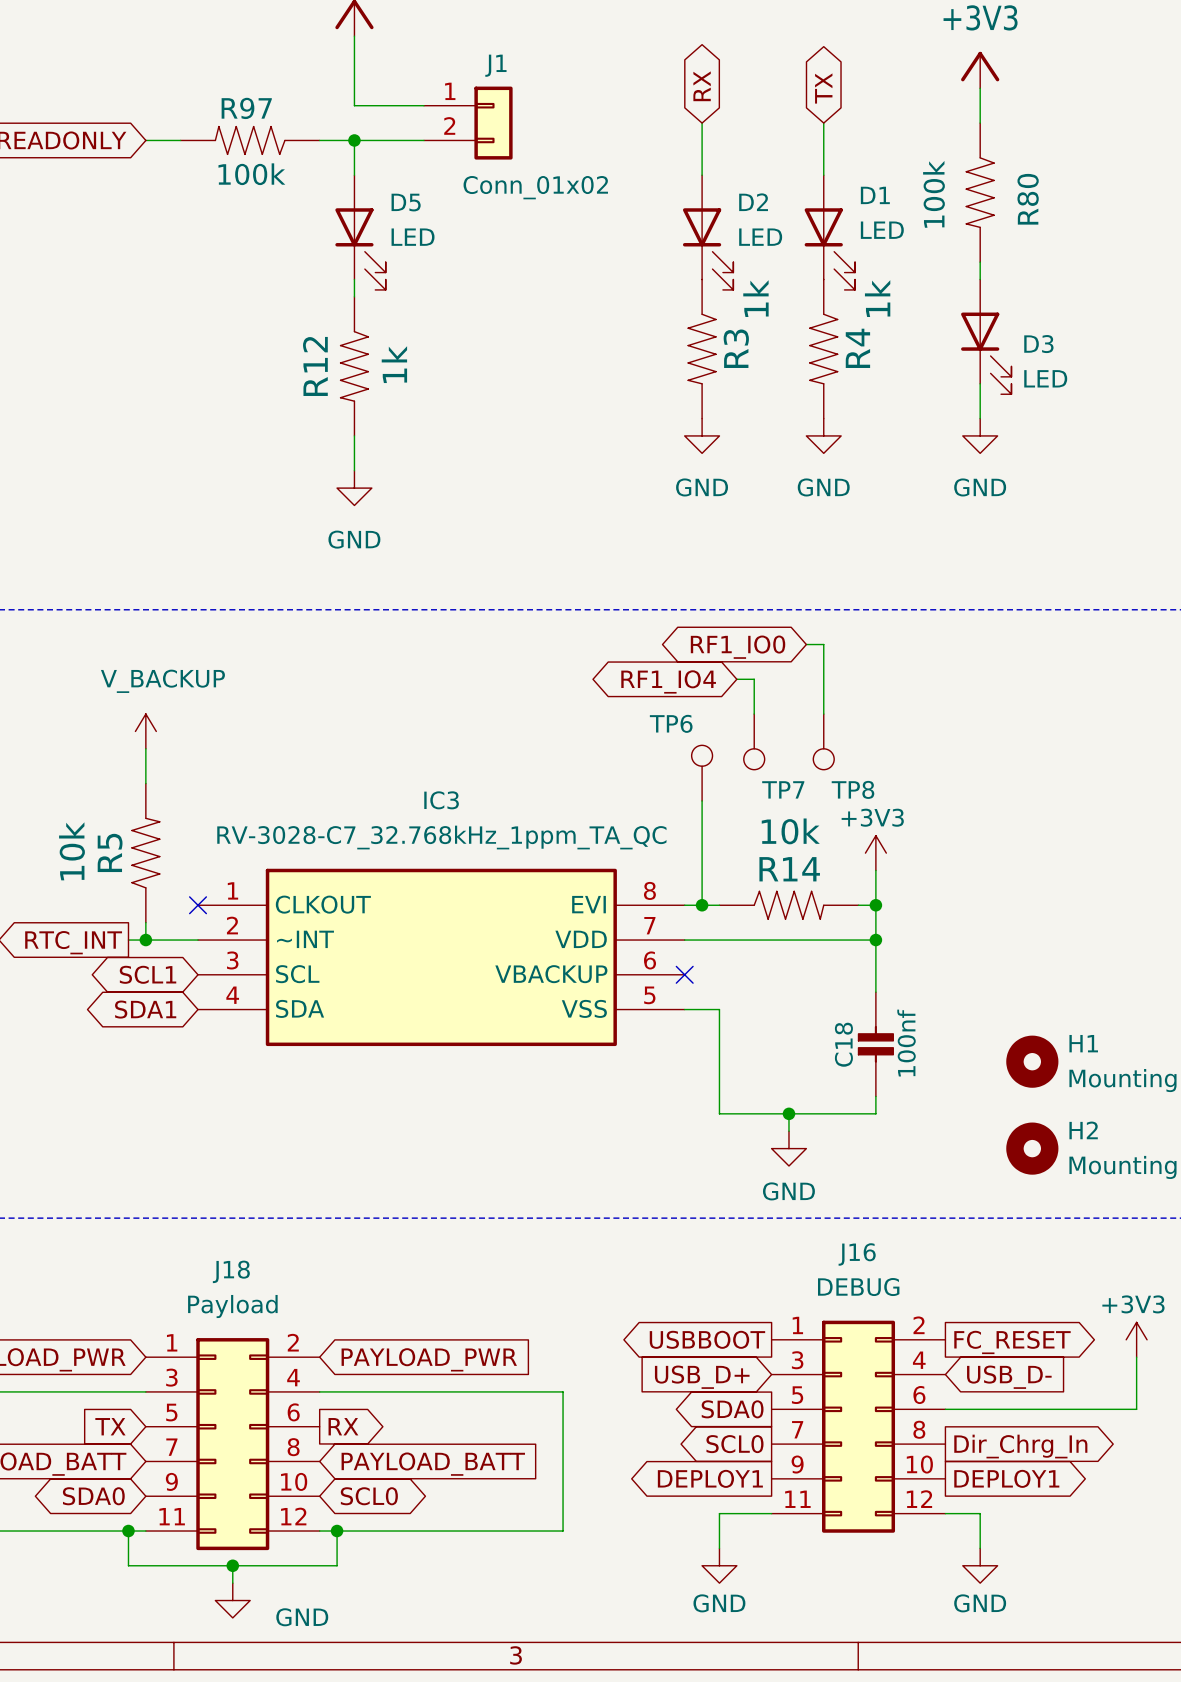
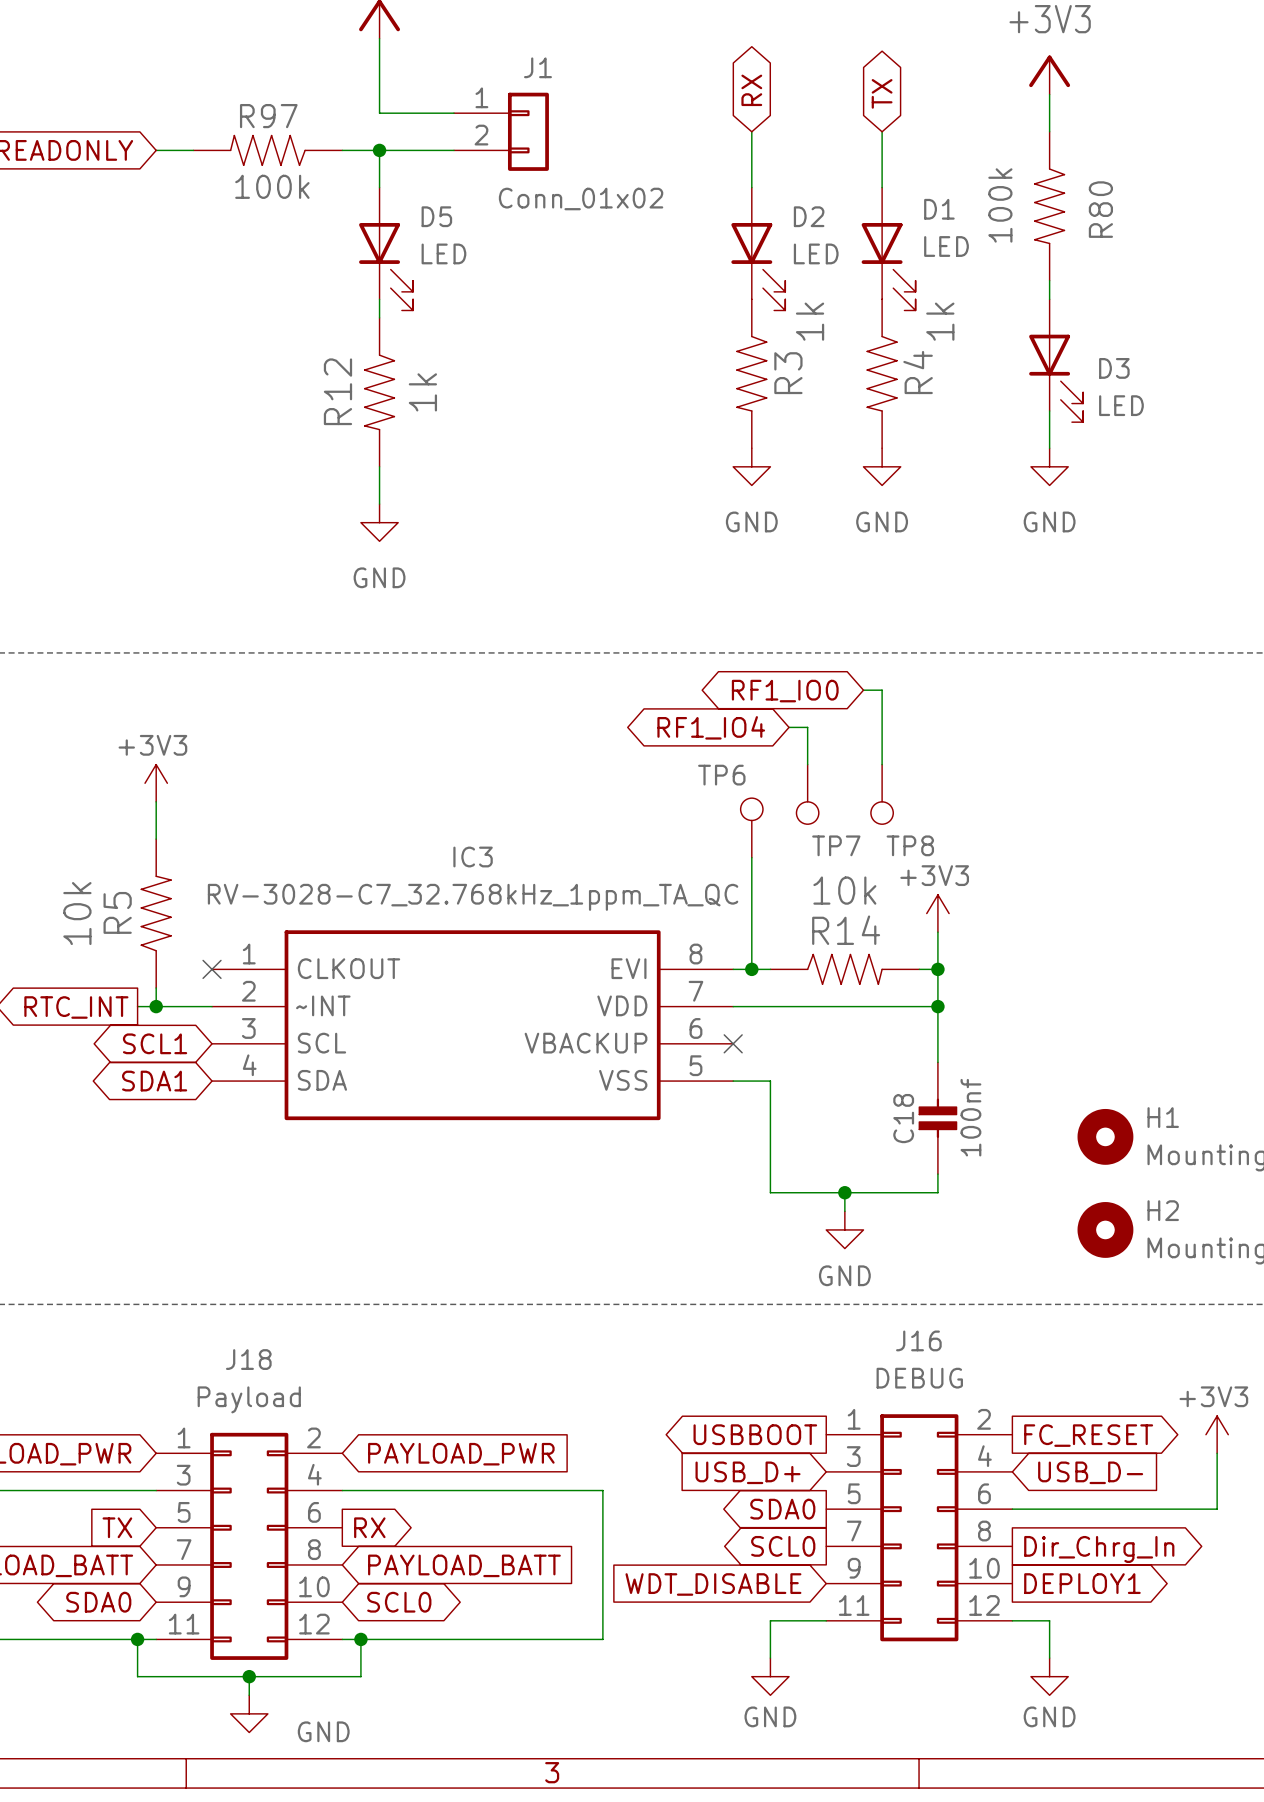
power symbol: V_BACKUP (145, 731) -> +3V3 (156, 783)
global label shape: output (710, 1478) -> input (713, 1584)
global label: DEPLOY1 (710, 1478) -> WDT_DISABLE (713, 1584)

